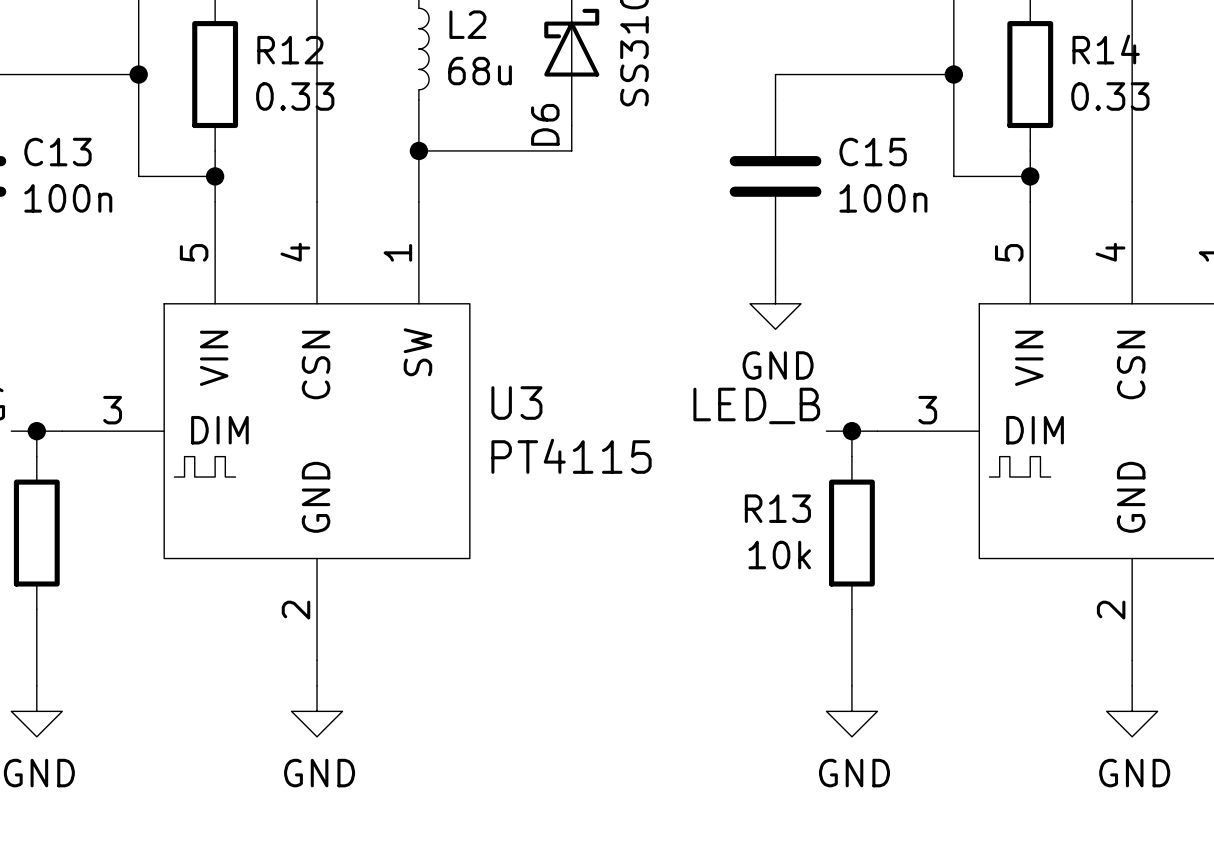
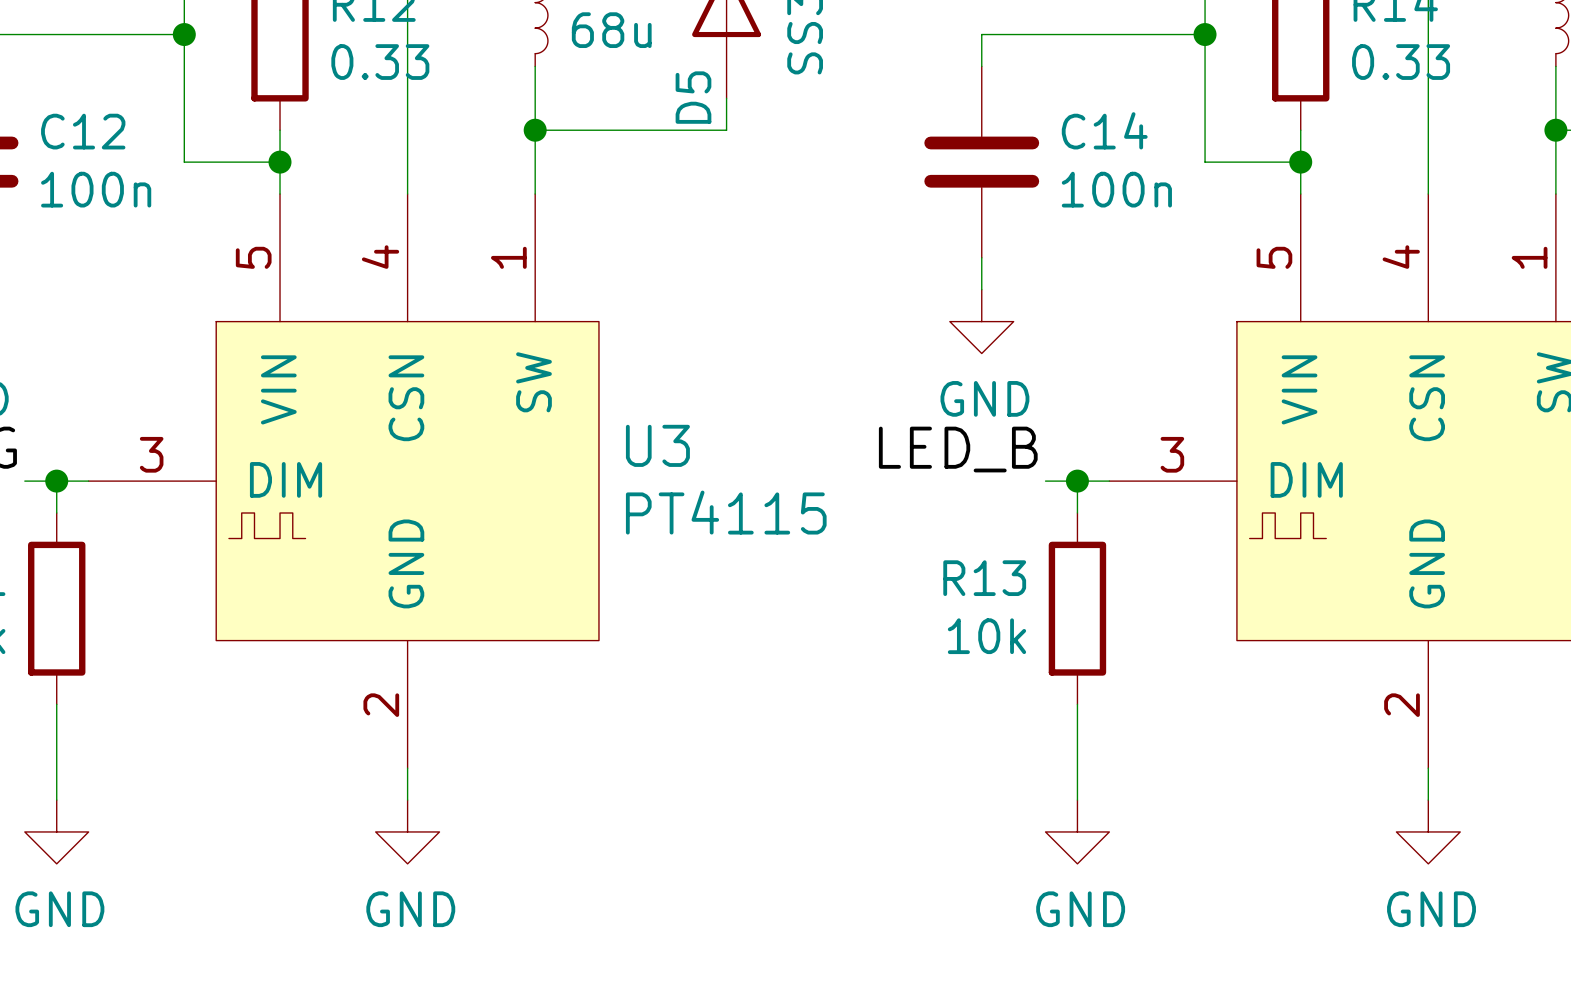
D6 name: D6 (545, 124) -> D5 (693, 97)
C13 name: C13 (57, 152) -> C12 (83, 131)
C15 name: C15 (873, 152) -> C14 (1104, 130)

